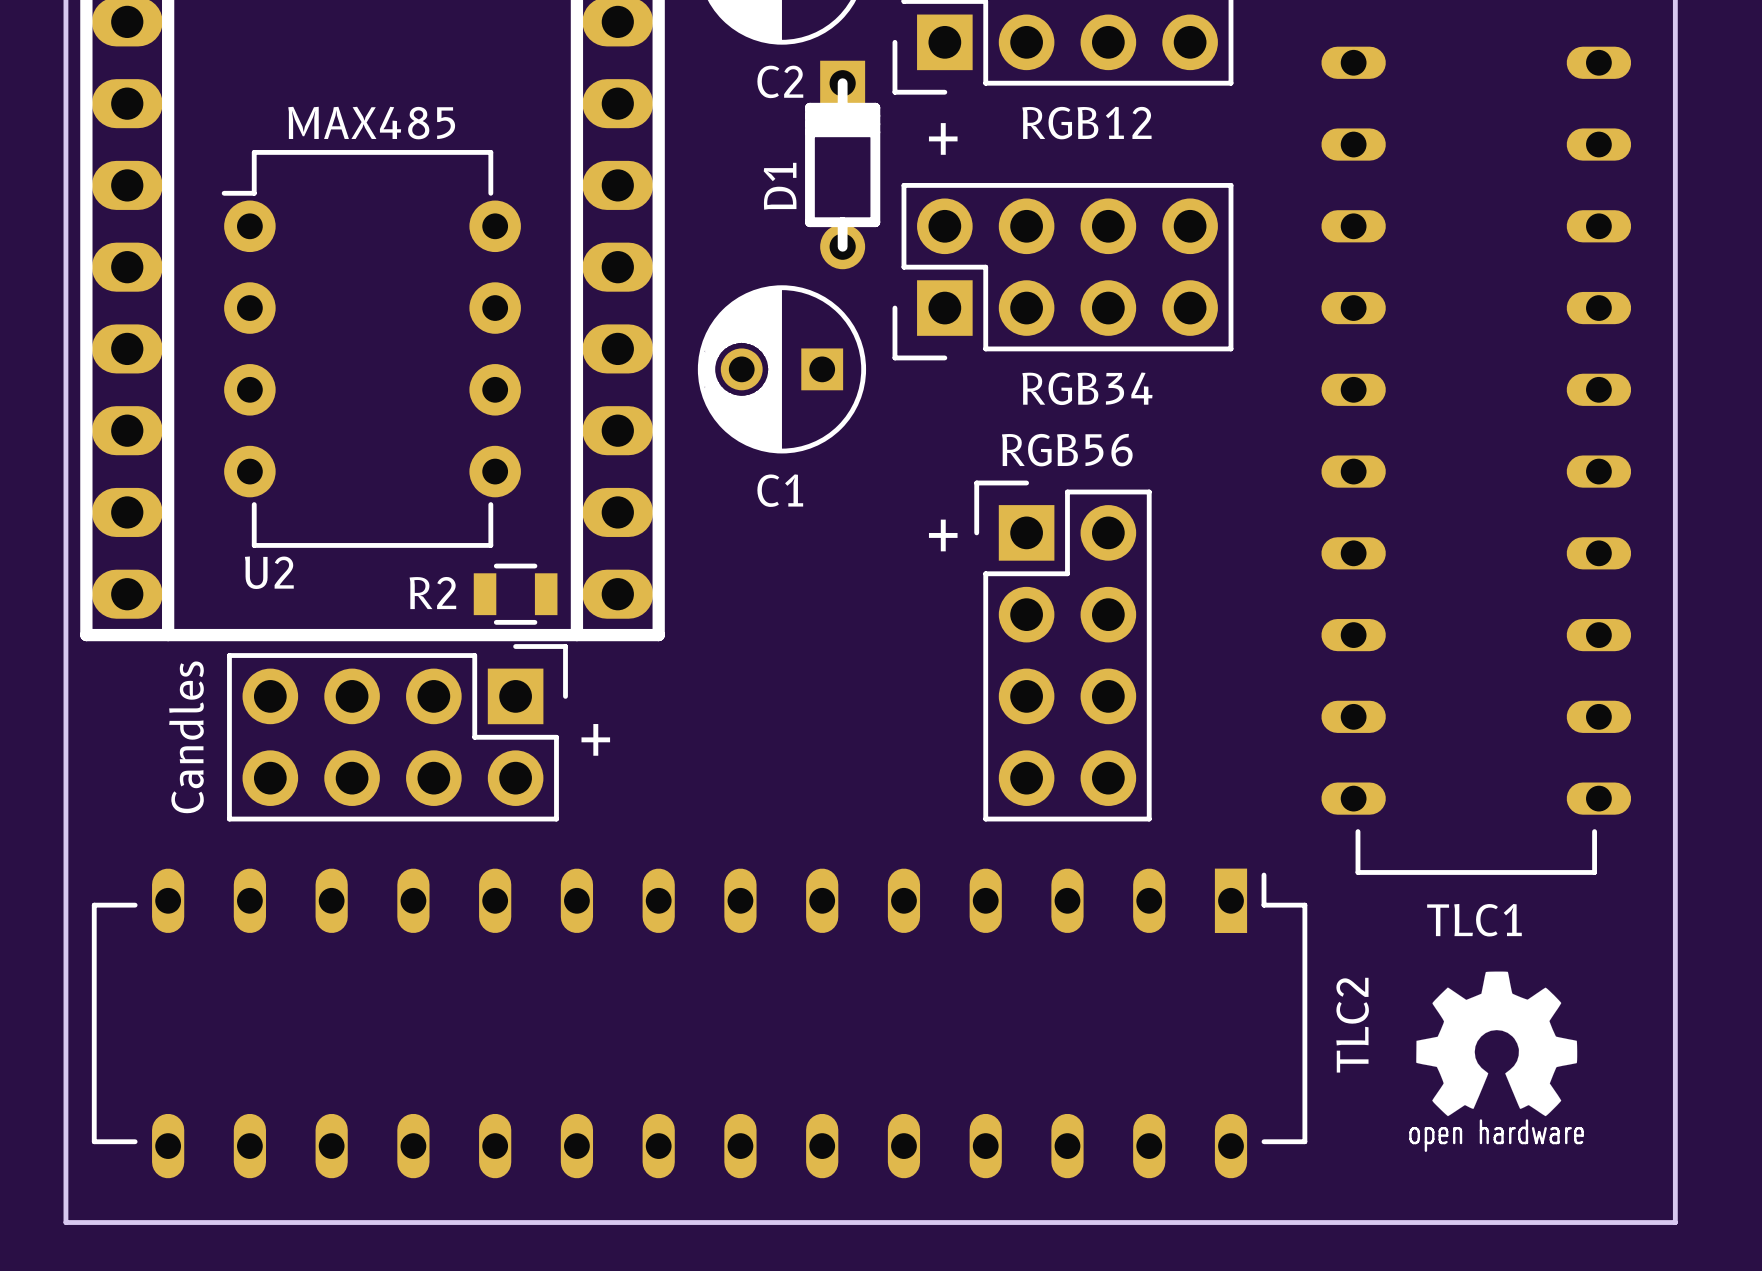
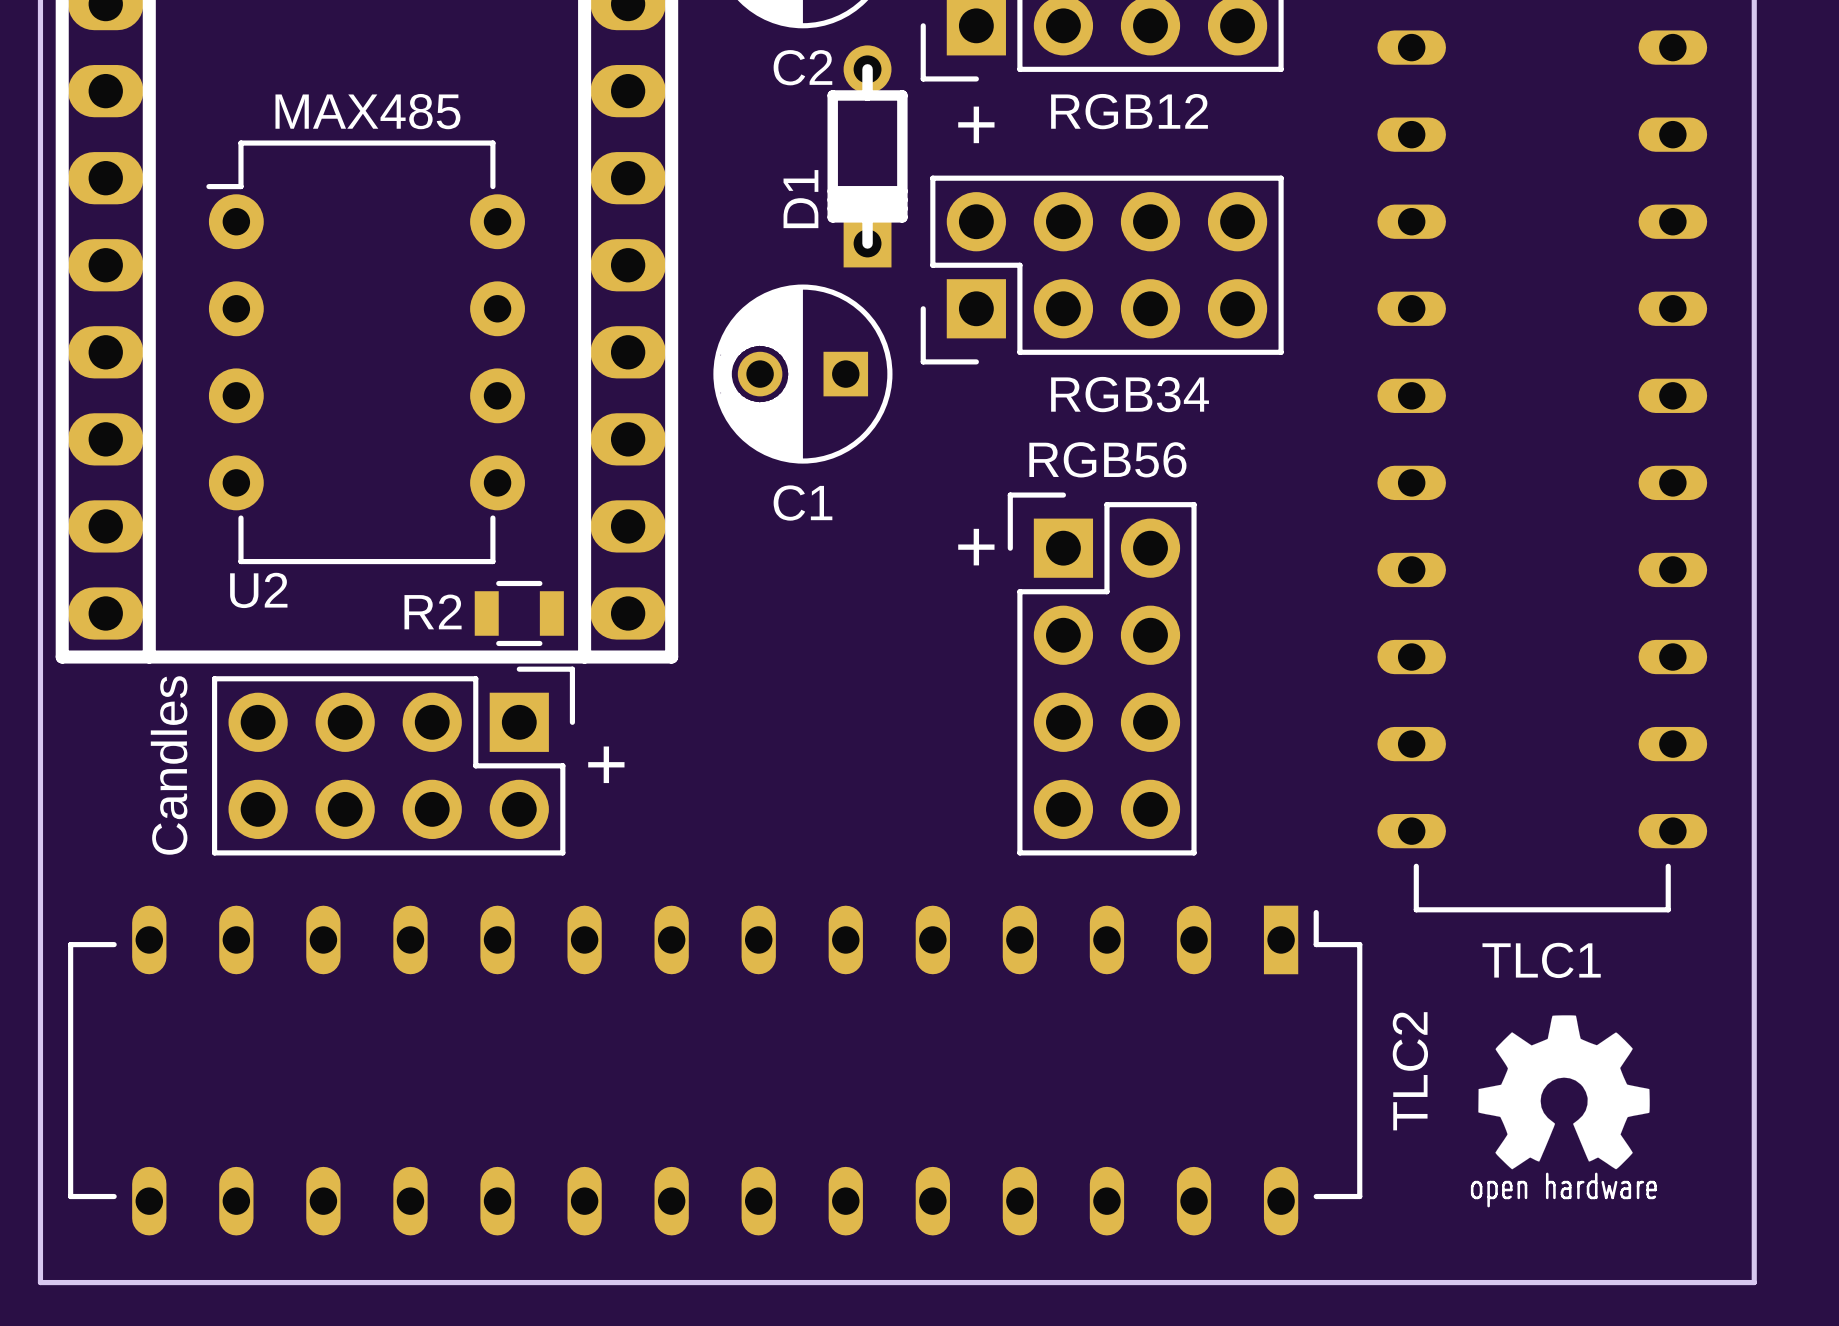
D1 rotation: 0° (842, 164) -> 180° (867, 156)

